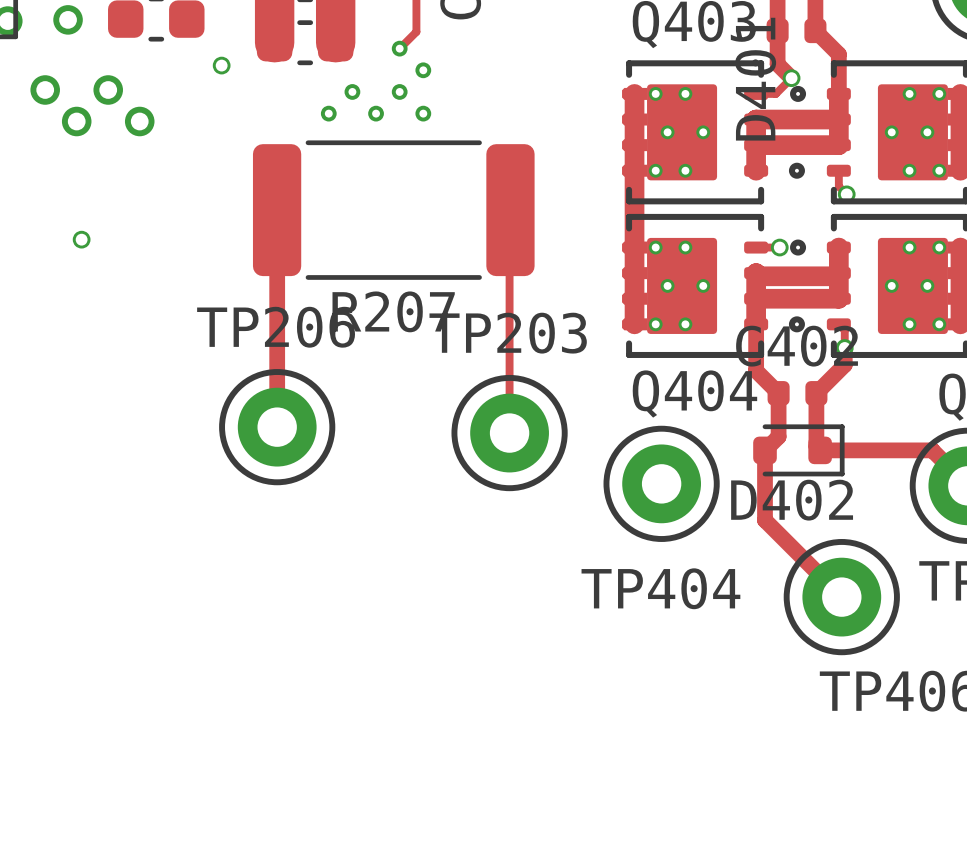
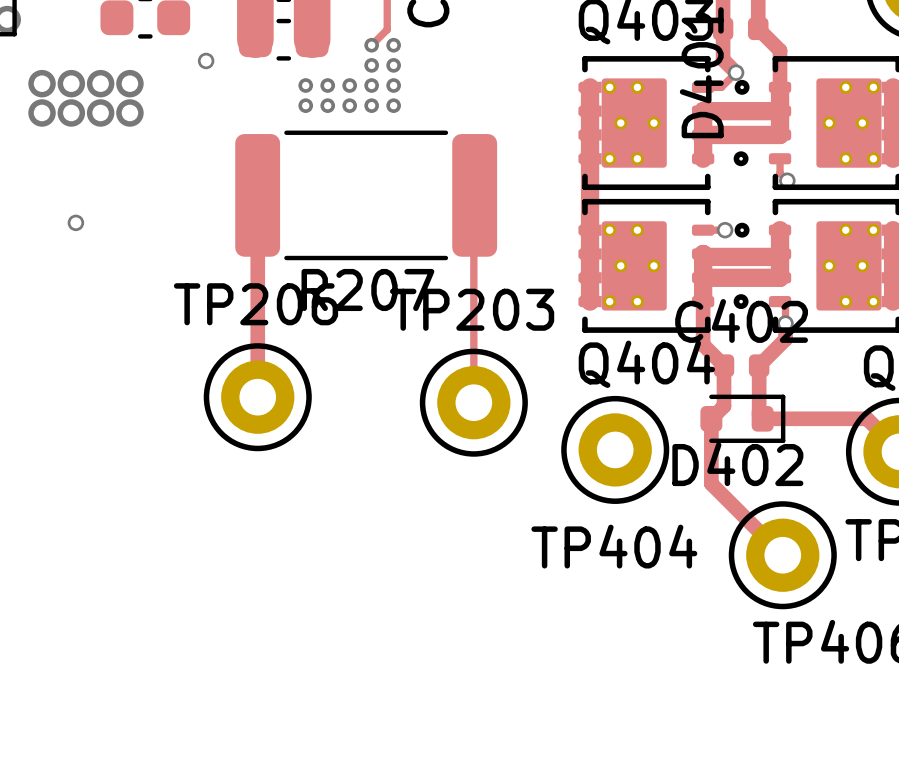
via: (68, 19) -> none
via: none -> (393, 45)
via: none -> (371, 65)
via: none -> (71, 83)
via: none -> (129, 83)
via: none -> (305, 85)
via: none -> (349, 85)
via: none -> (393, 85)
via: none -> (327, 105)
via: none -> (371, 105)
via: none -> (42, 112)
via: none -> (100, 112)

